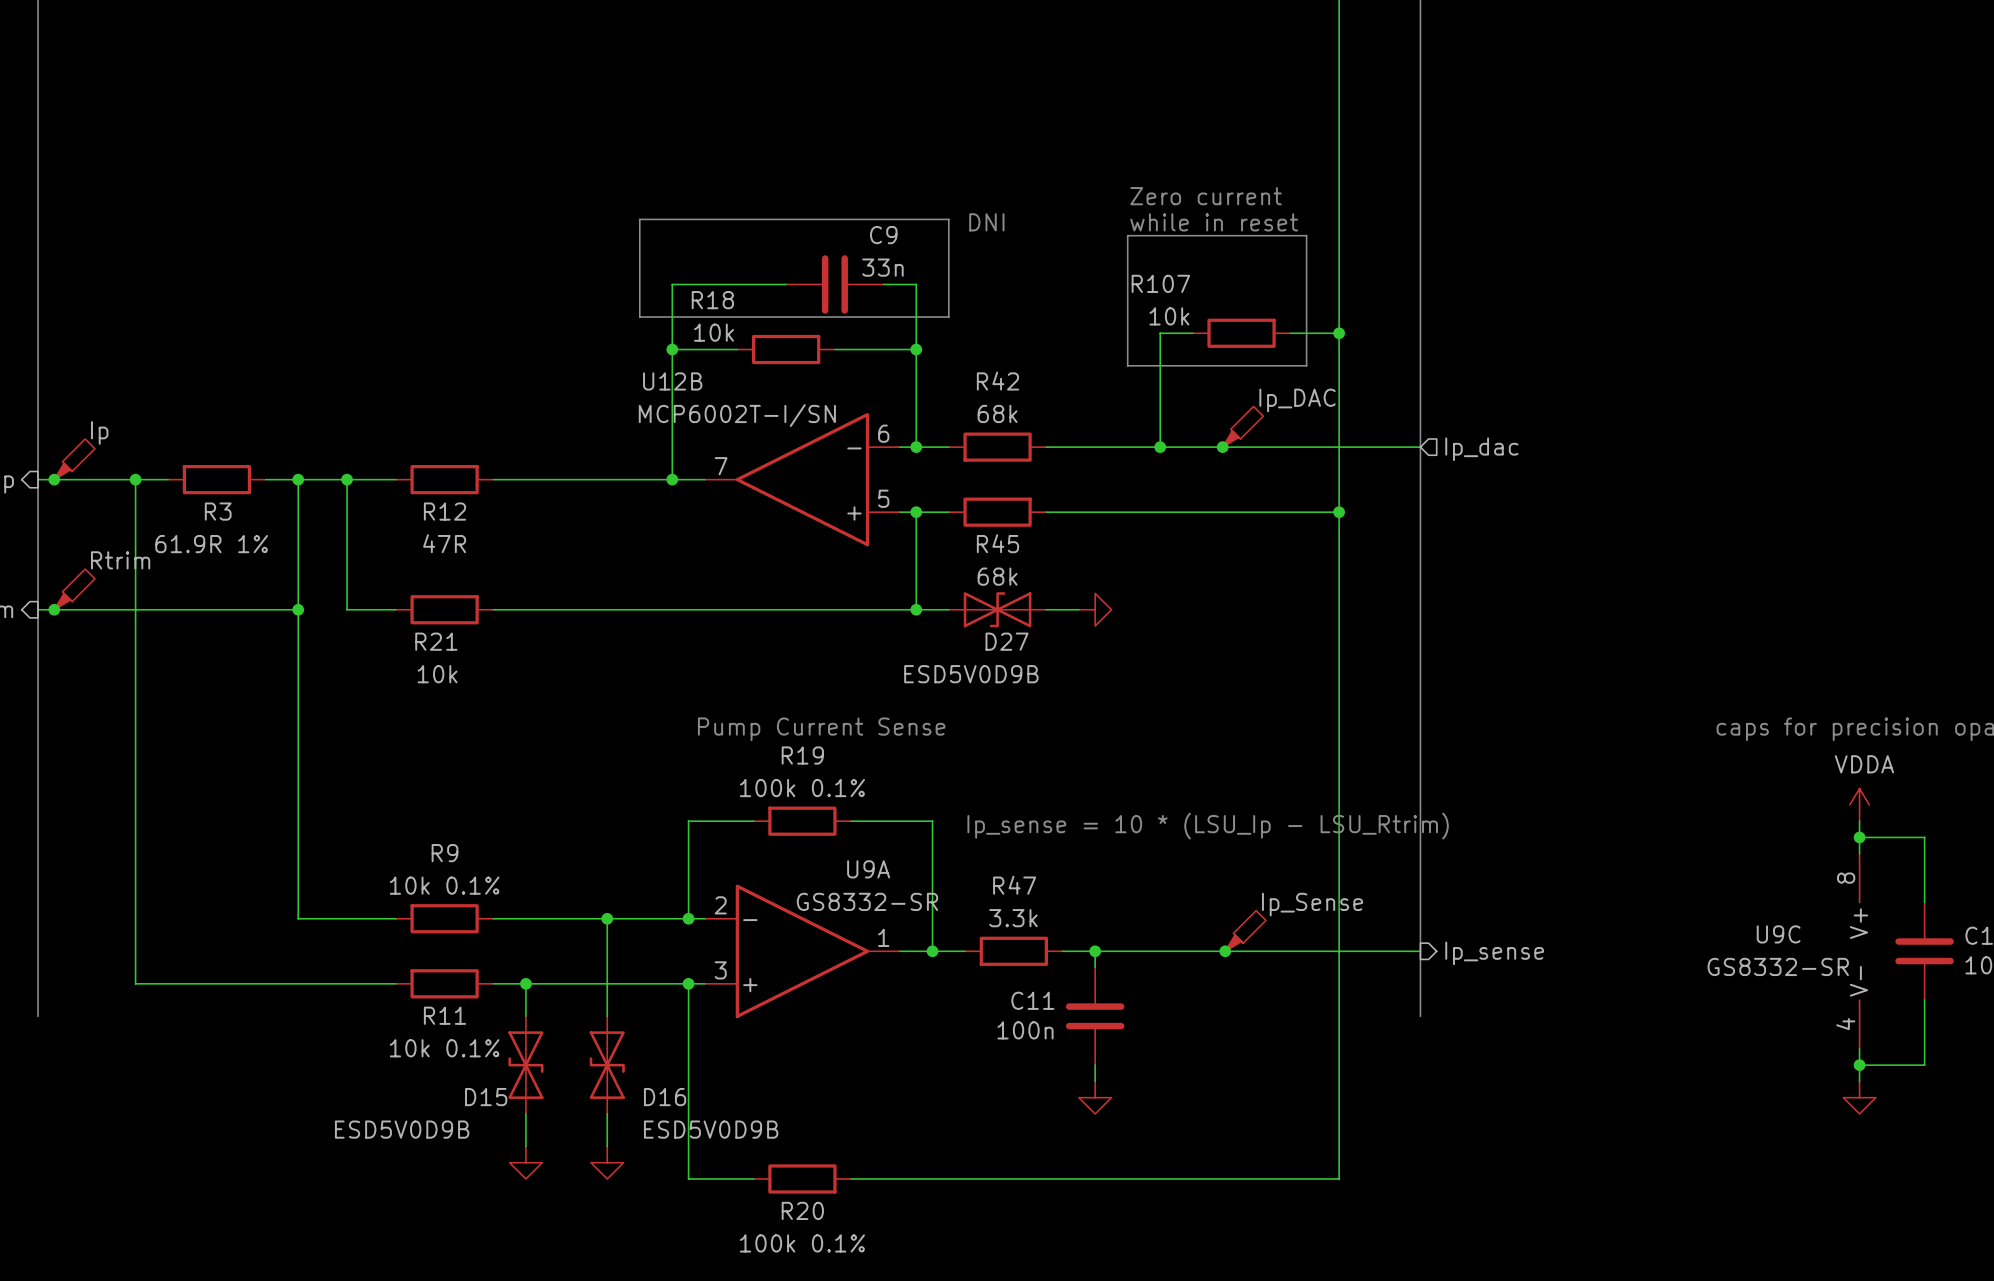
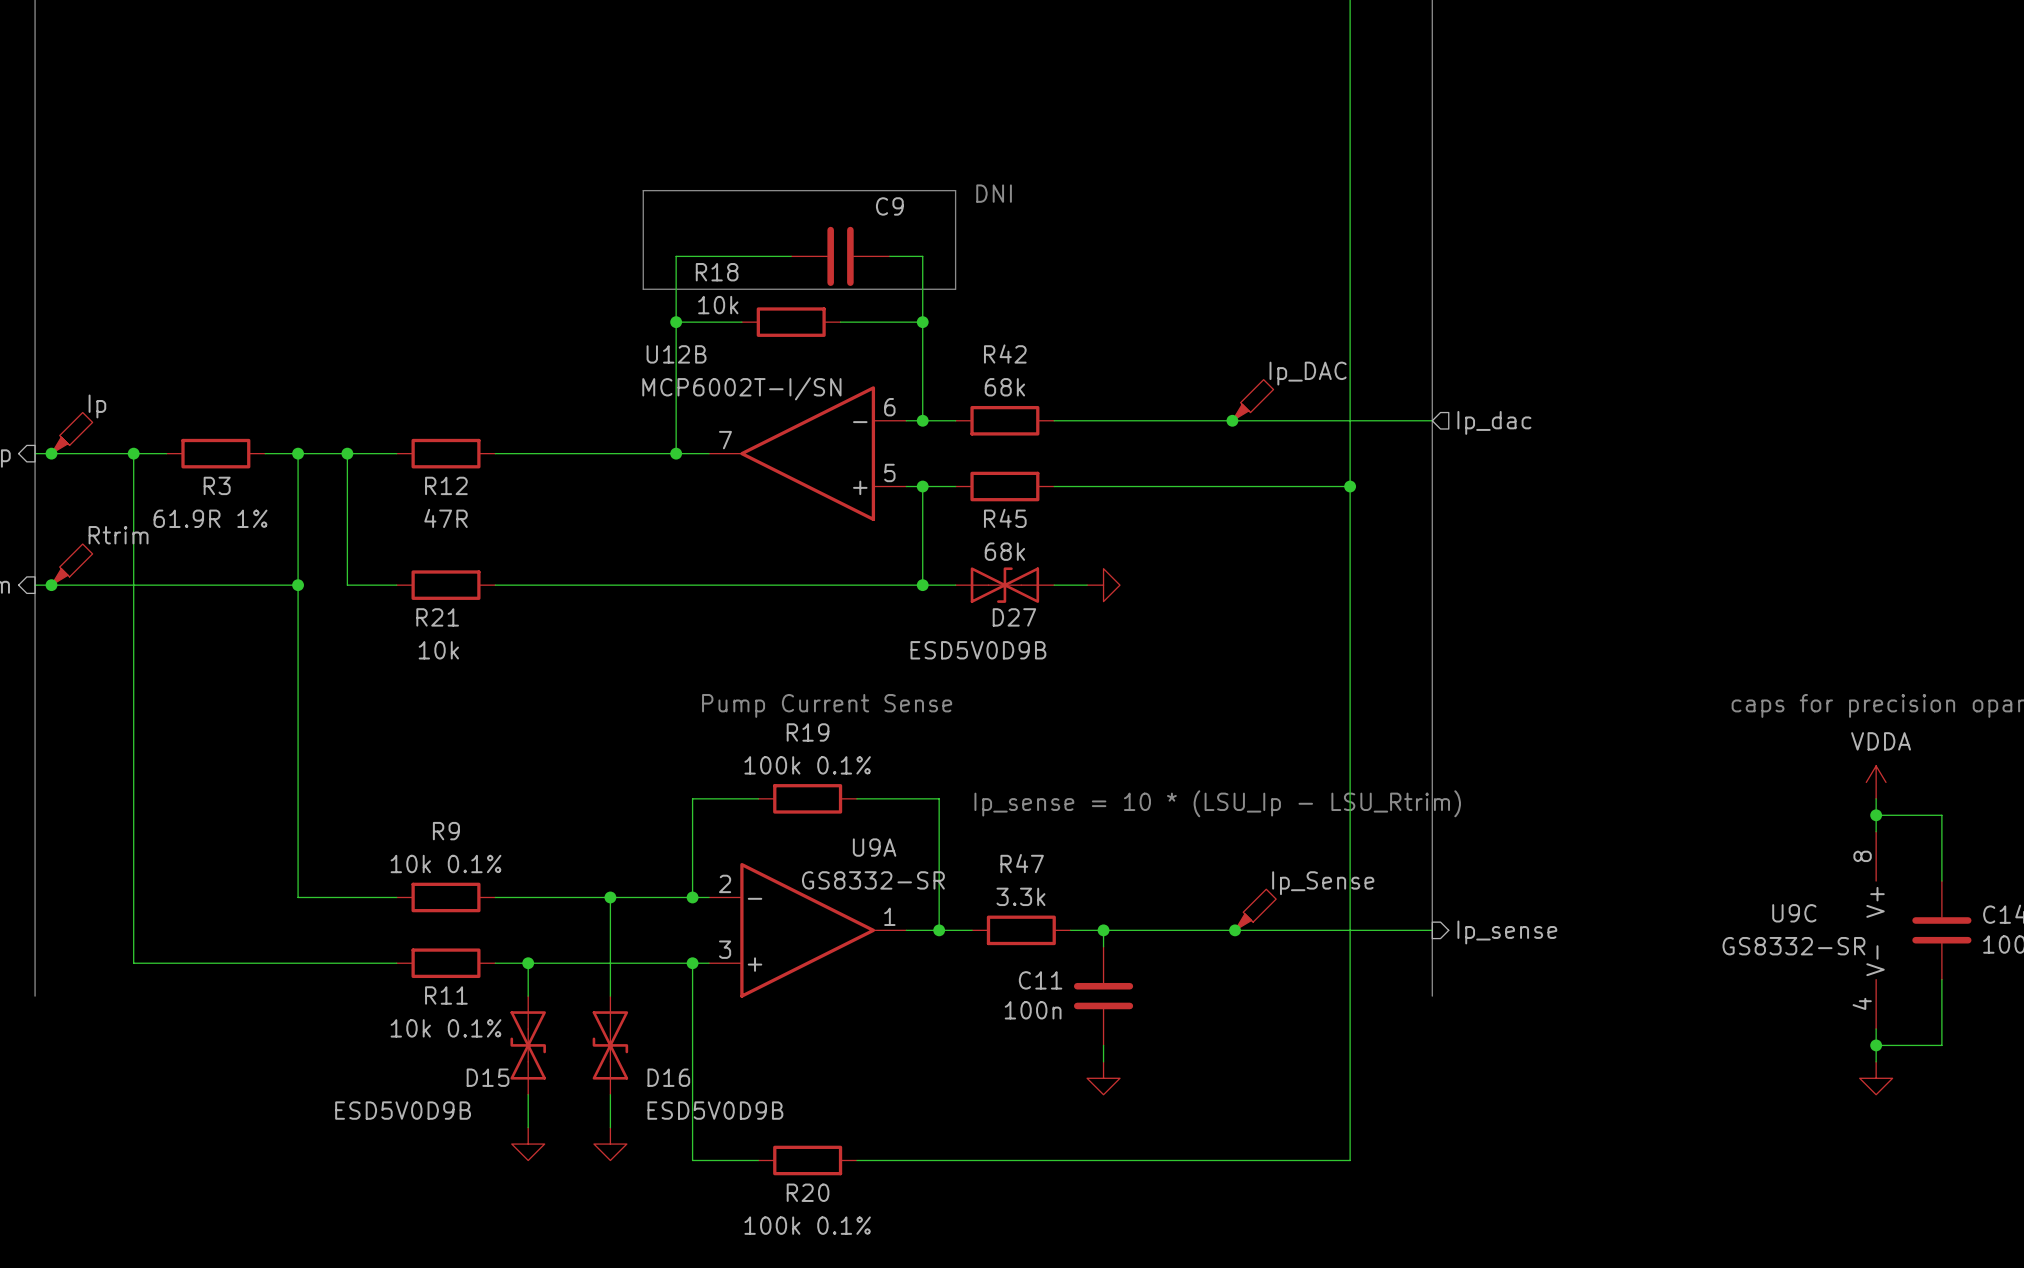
text: Zero current (1206, 196) -> none
text: while in reset (1214, 222) -> none
line: (1127, 235) (1306, 235) (1306, 365) (1127, 365) (1127, 235) -> none
C9 value: 33n (882, 267) -> none
wire: (1192, 333) (1160, 333) (1160, 447) -> none
R107: 10k (1241, 333) -> none
wire: (1290, 333) (1339, 333) -> none
junction: (1339, 333) -> none
junction: (1160, 447) -> none

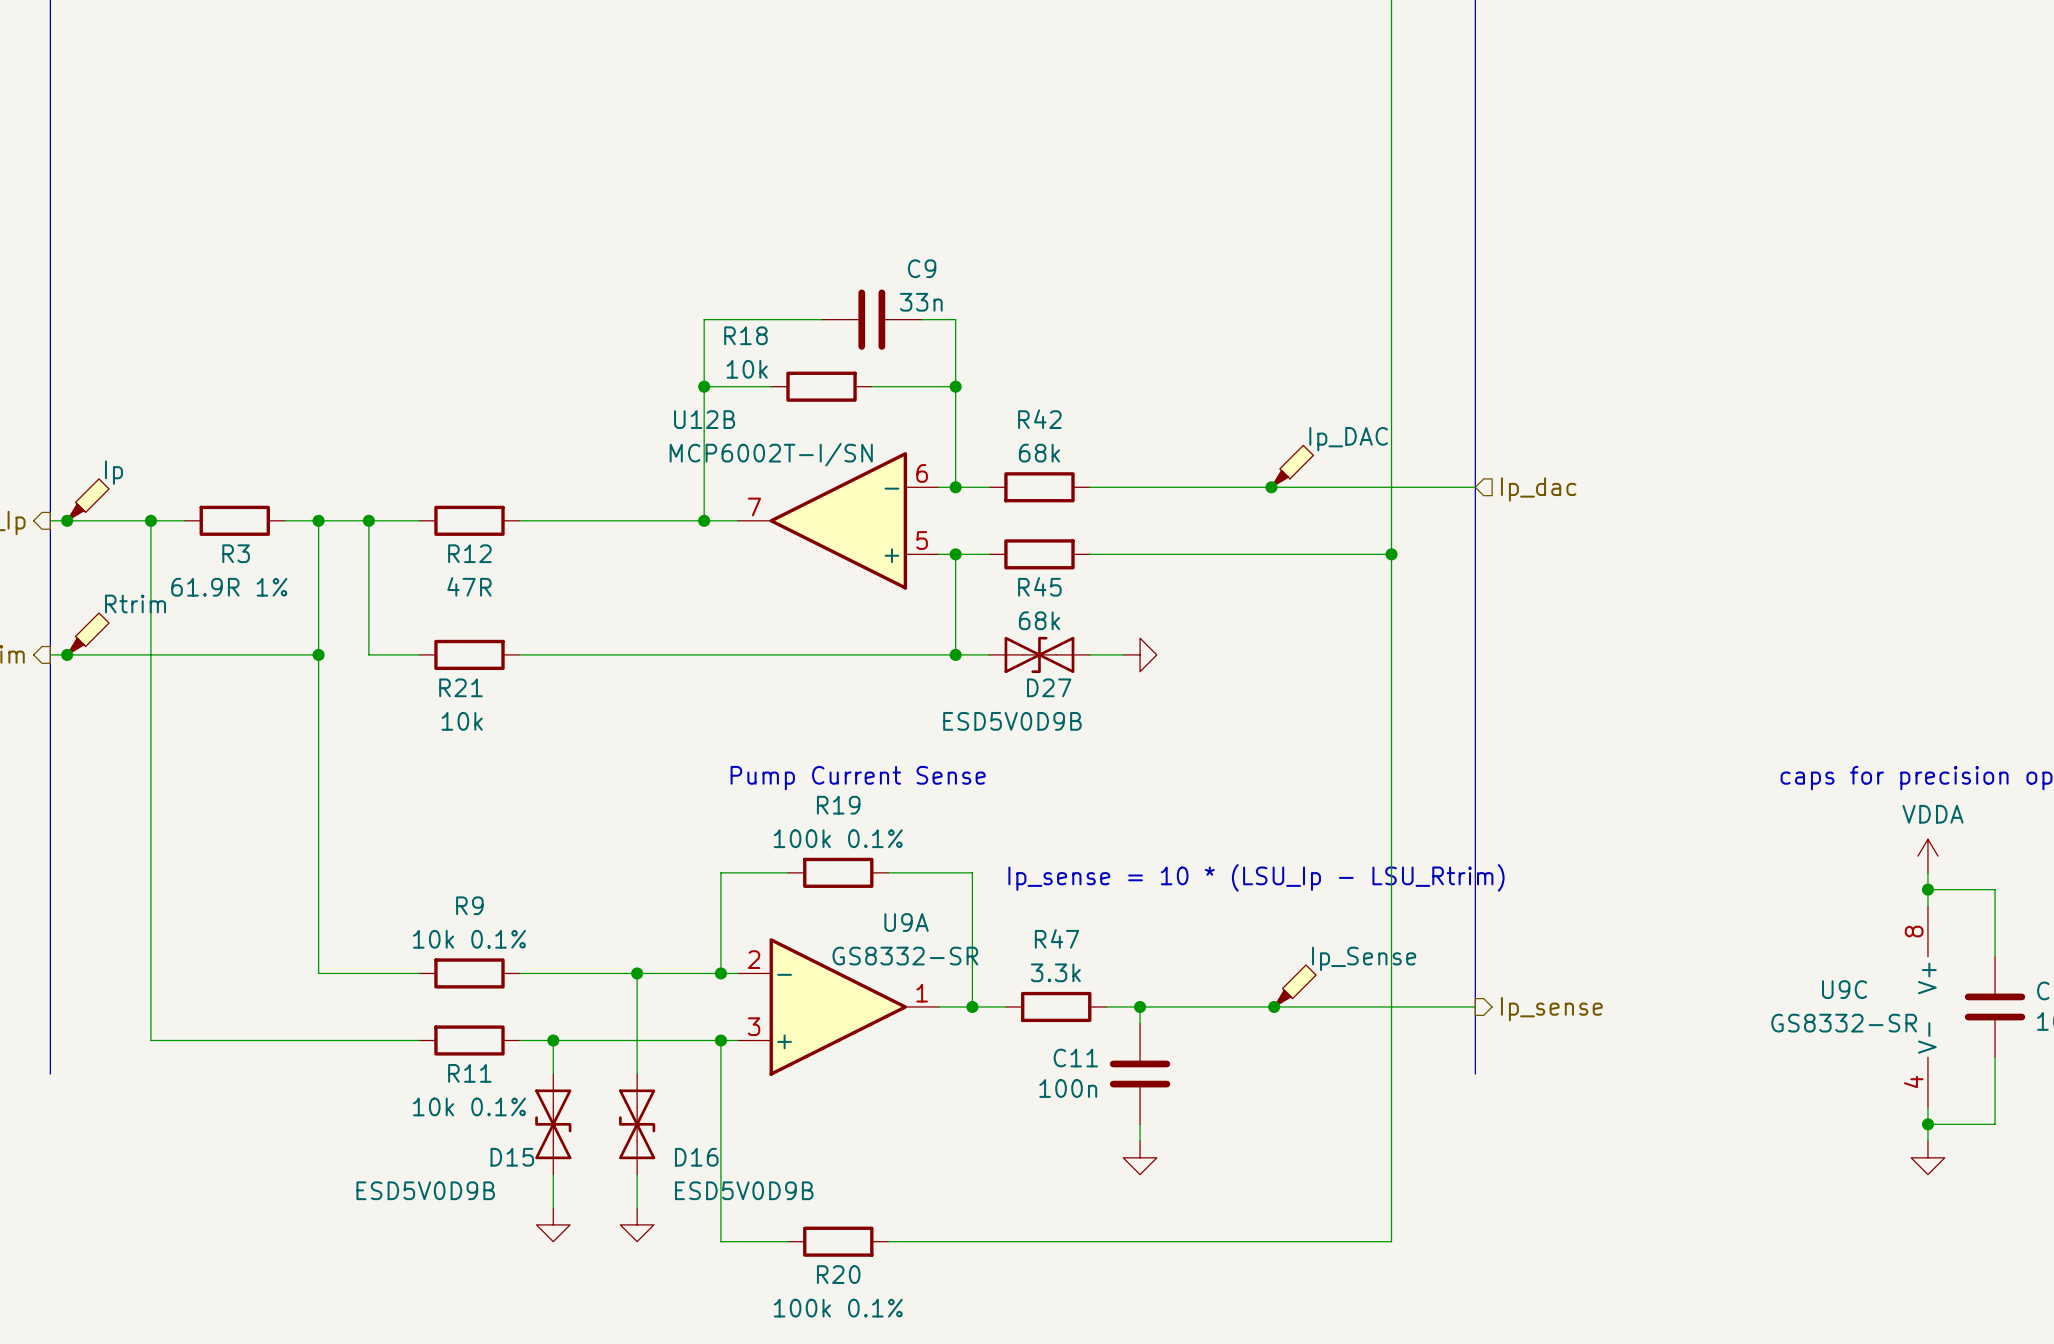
line: (643, 190) (643, 289) (955, 289) (955, 190) (643, 190) -> none
text: DNI (994, 193) -> none
C9 value: none -> 33n (921, 302)

